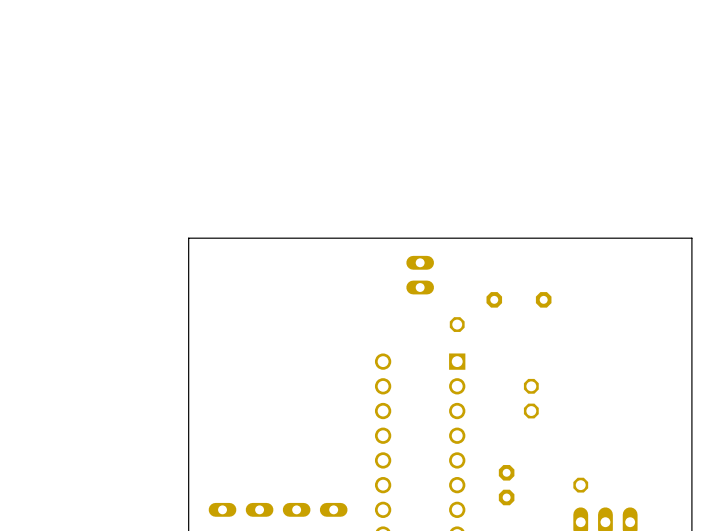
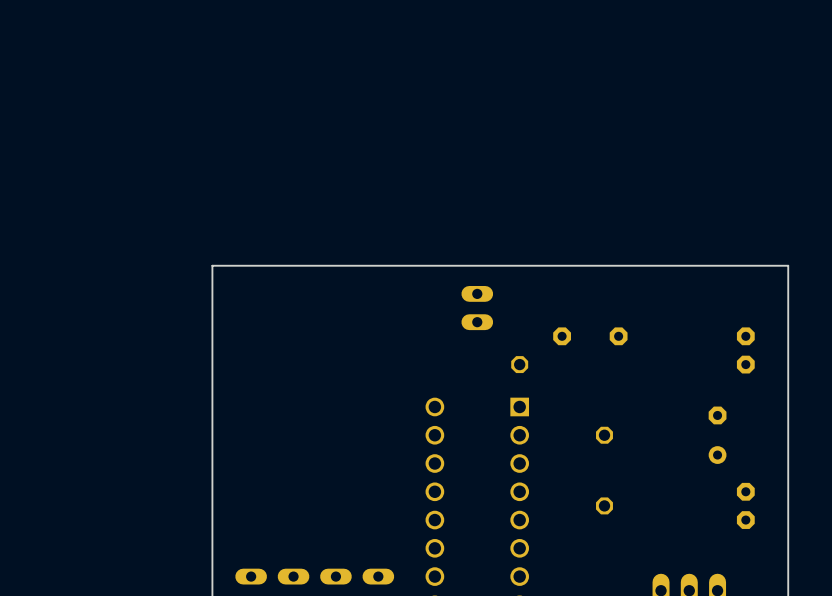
part: none -> (745, 350)
part: none -> (717, 435)
part: (531, 411) -> none
part: none -> (604, 505)
part: none -> (745, 505)
part: (506, 485) -> none
part: (580, 485) -> none

